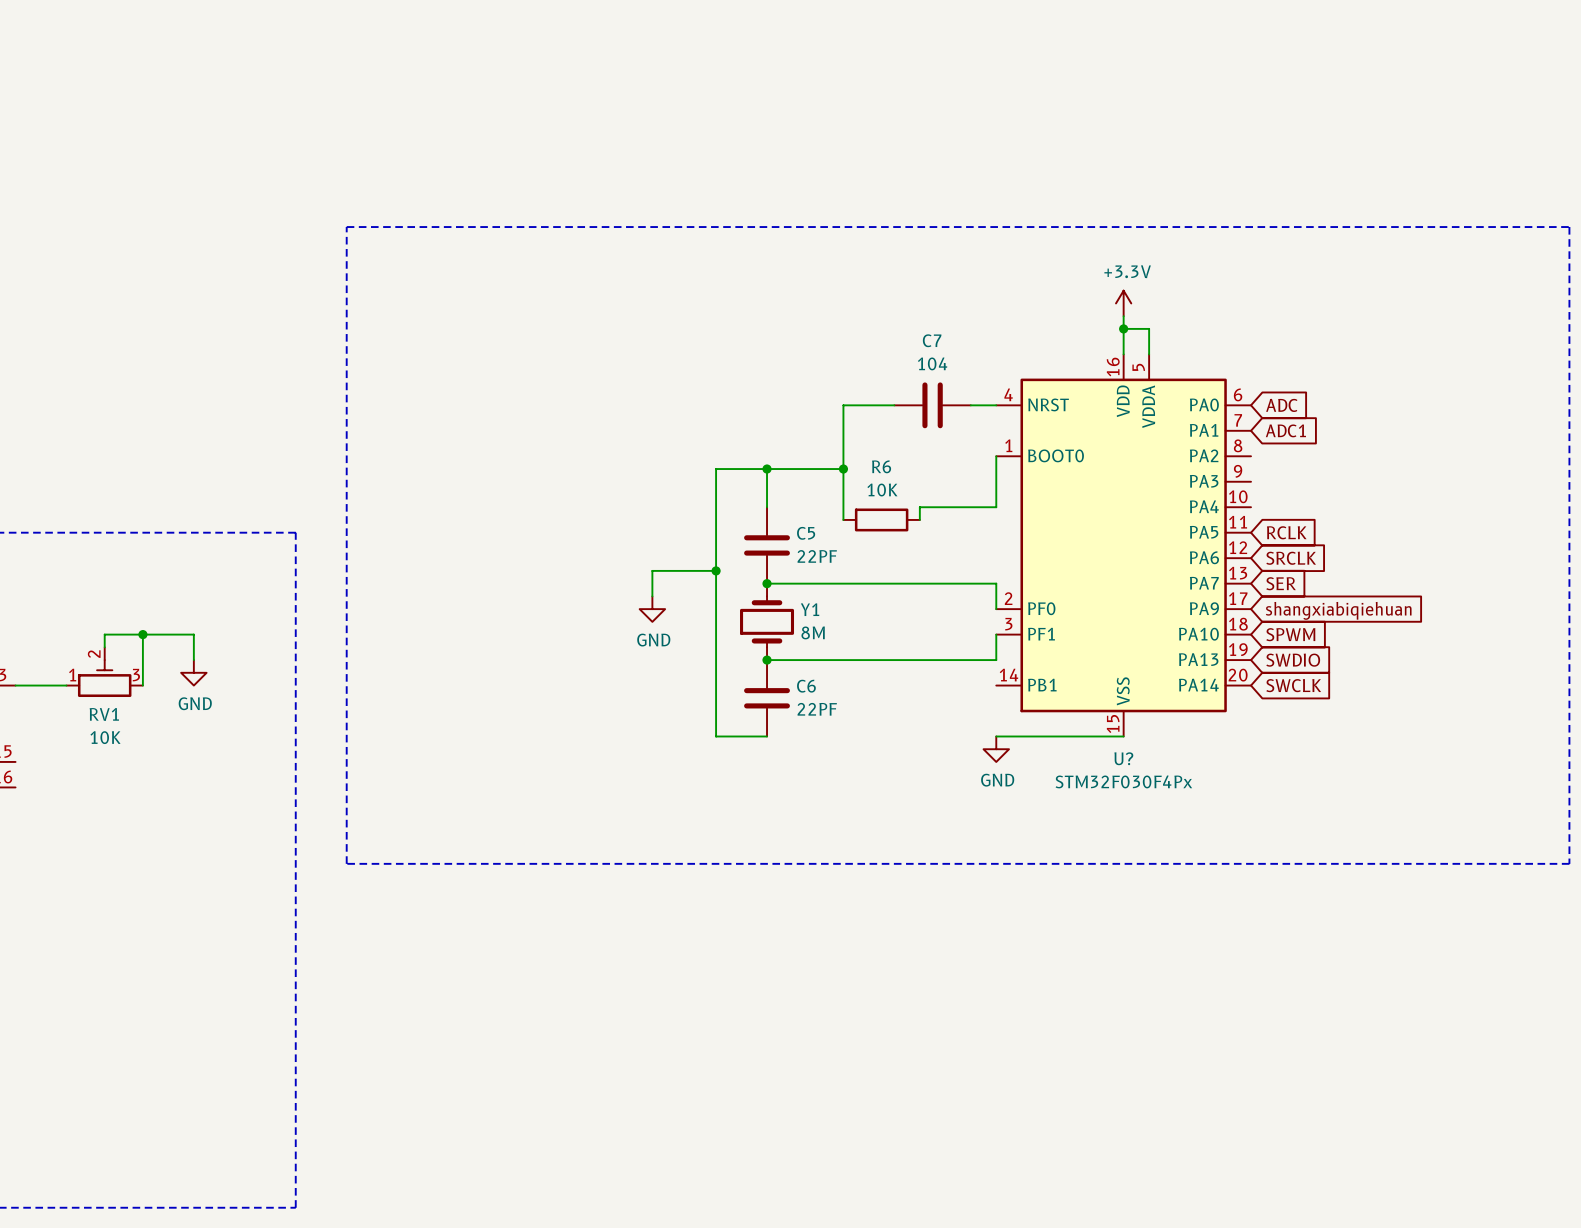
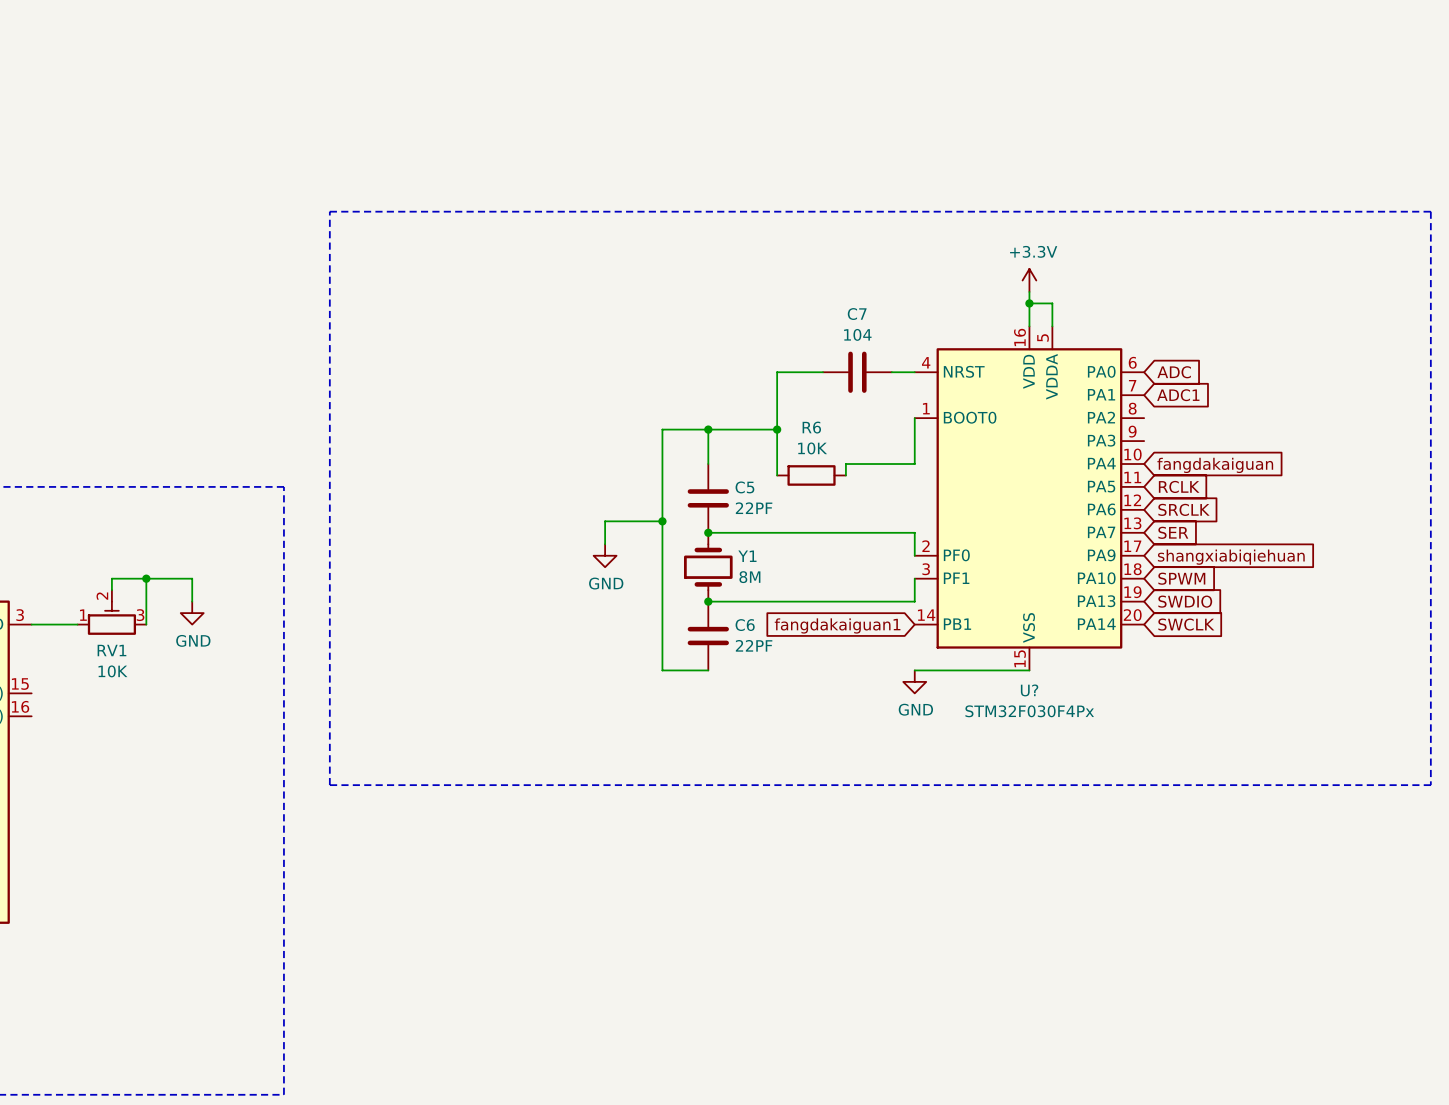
global label: none -> fangdakaiguan (1215, 465)
global label: none -> fangdakaiguan1 (837, 625)

